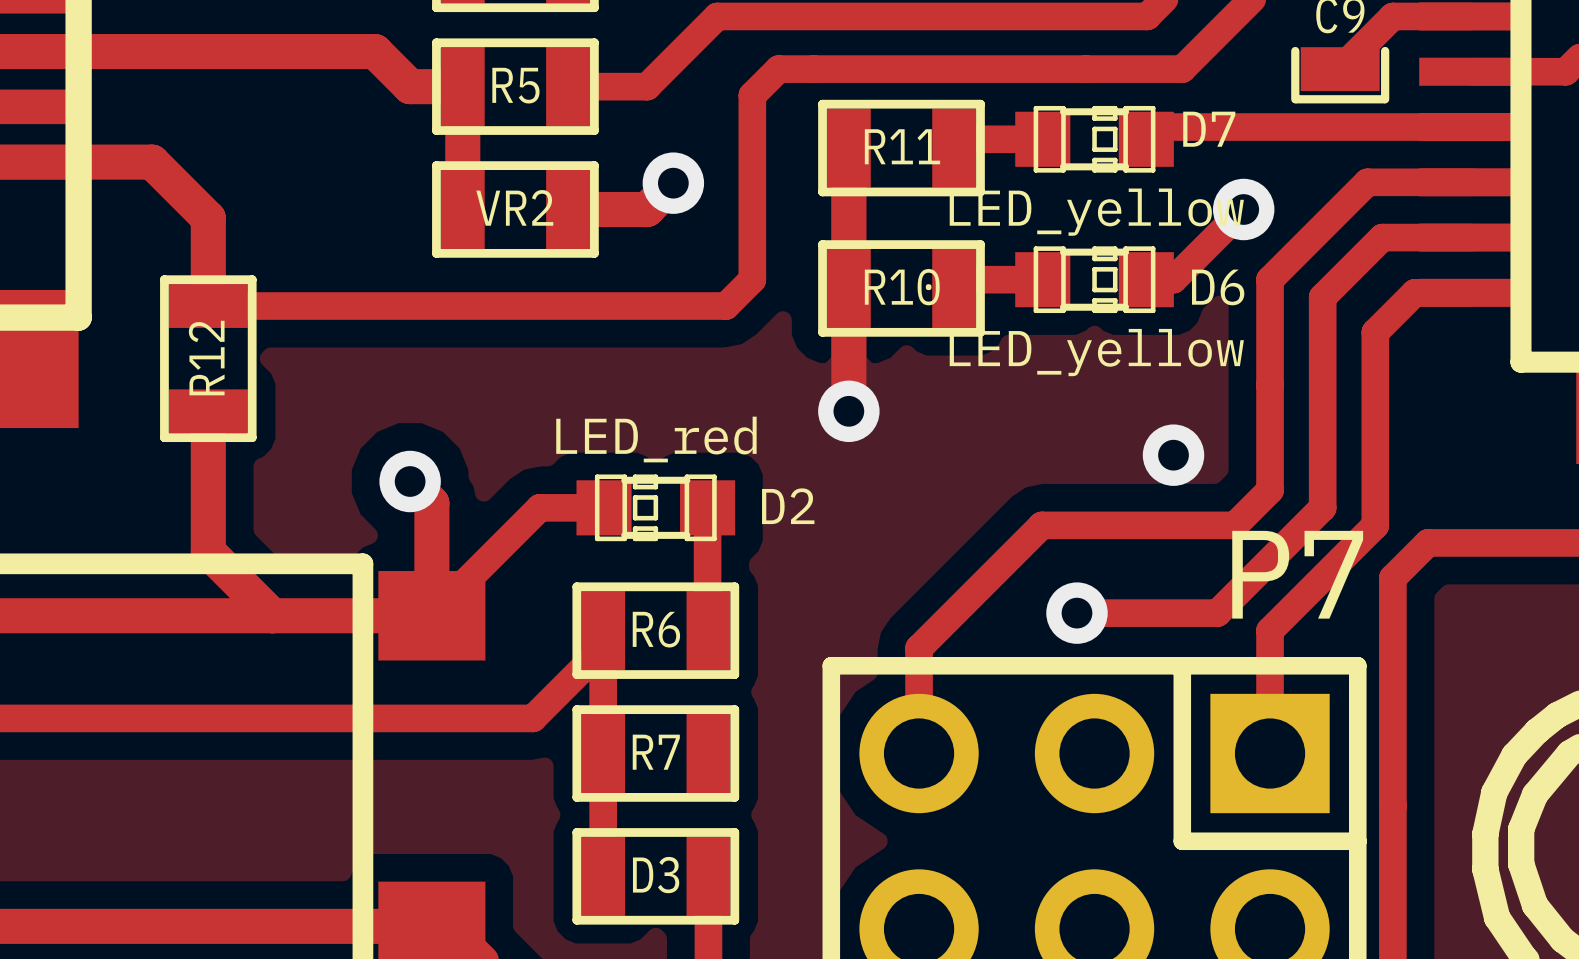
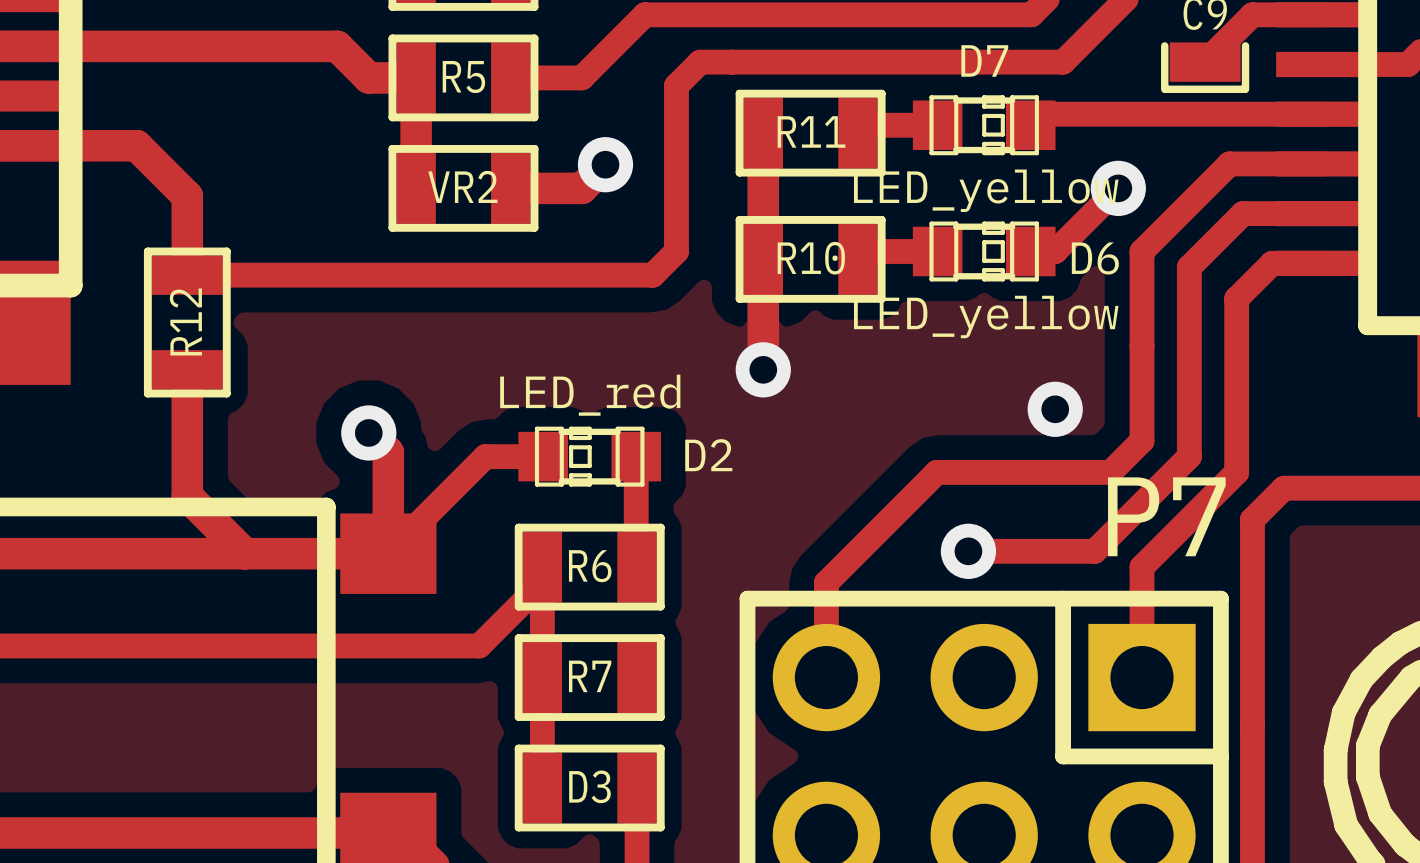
D7 name position: D7 (1209, 129) -> D7 (984, 60)

